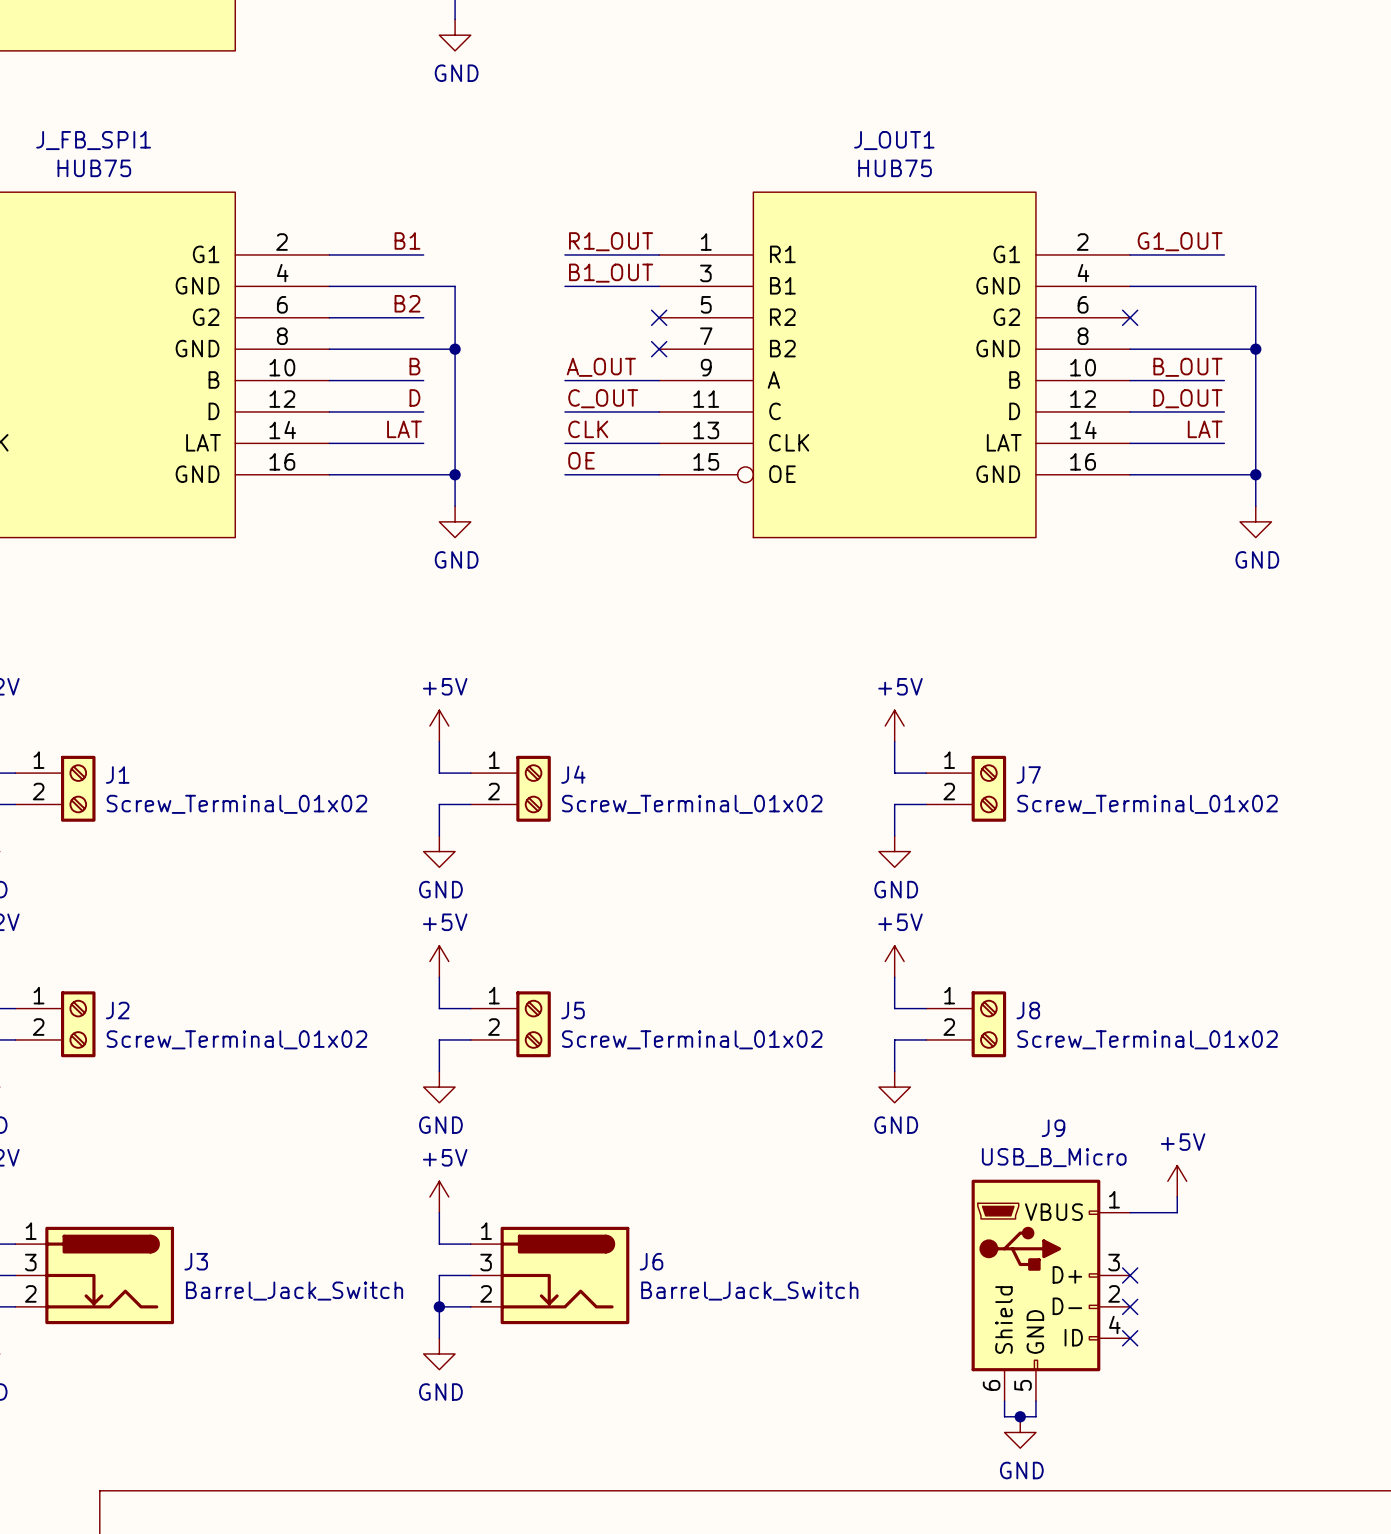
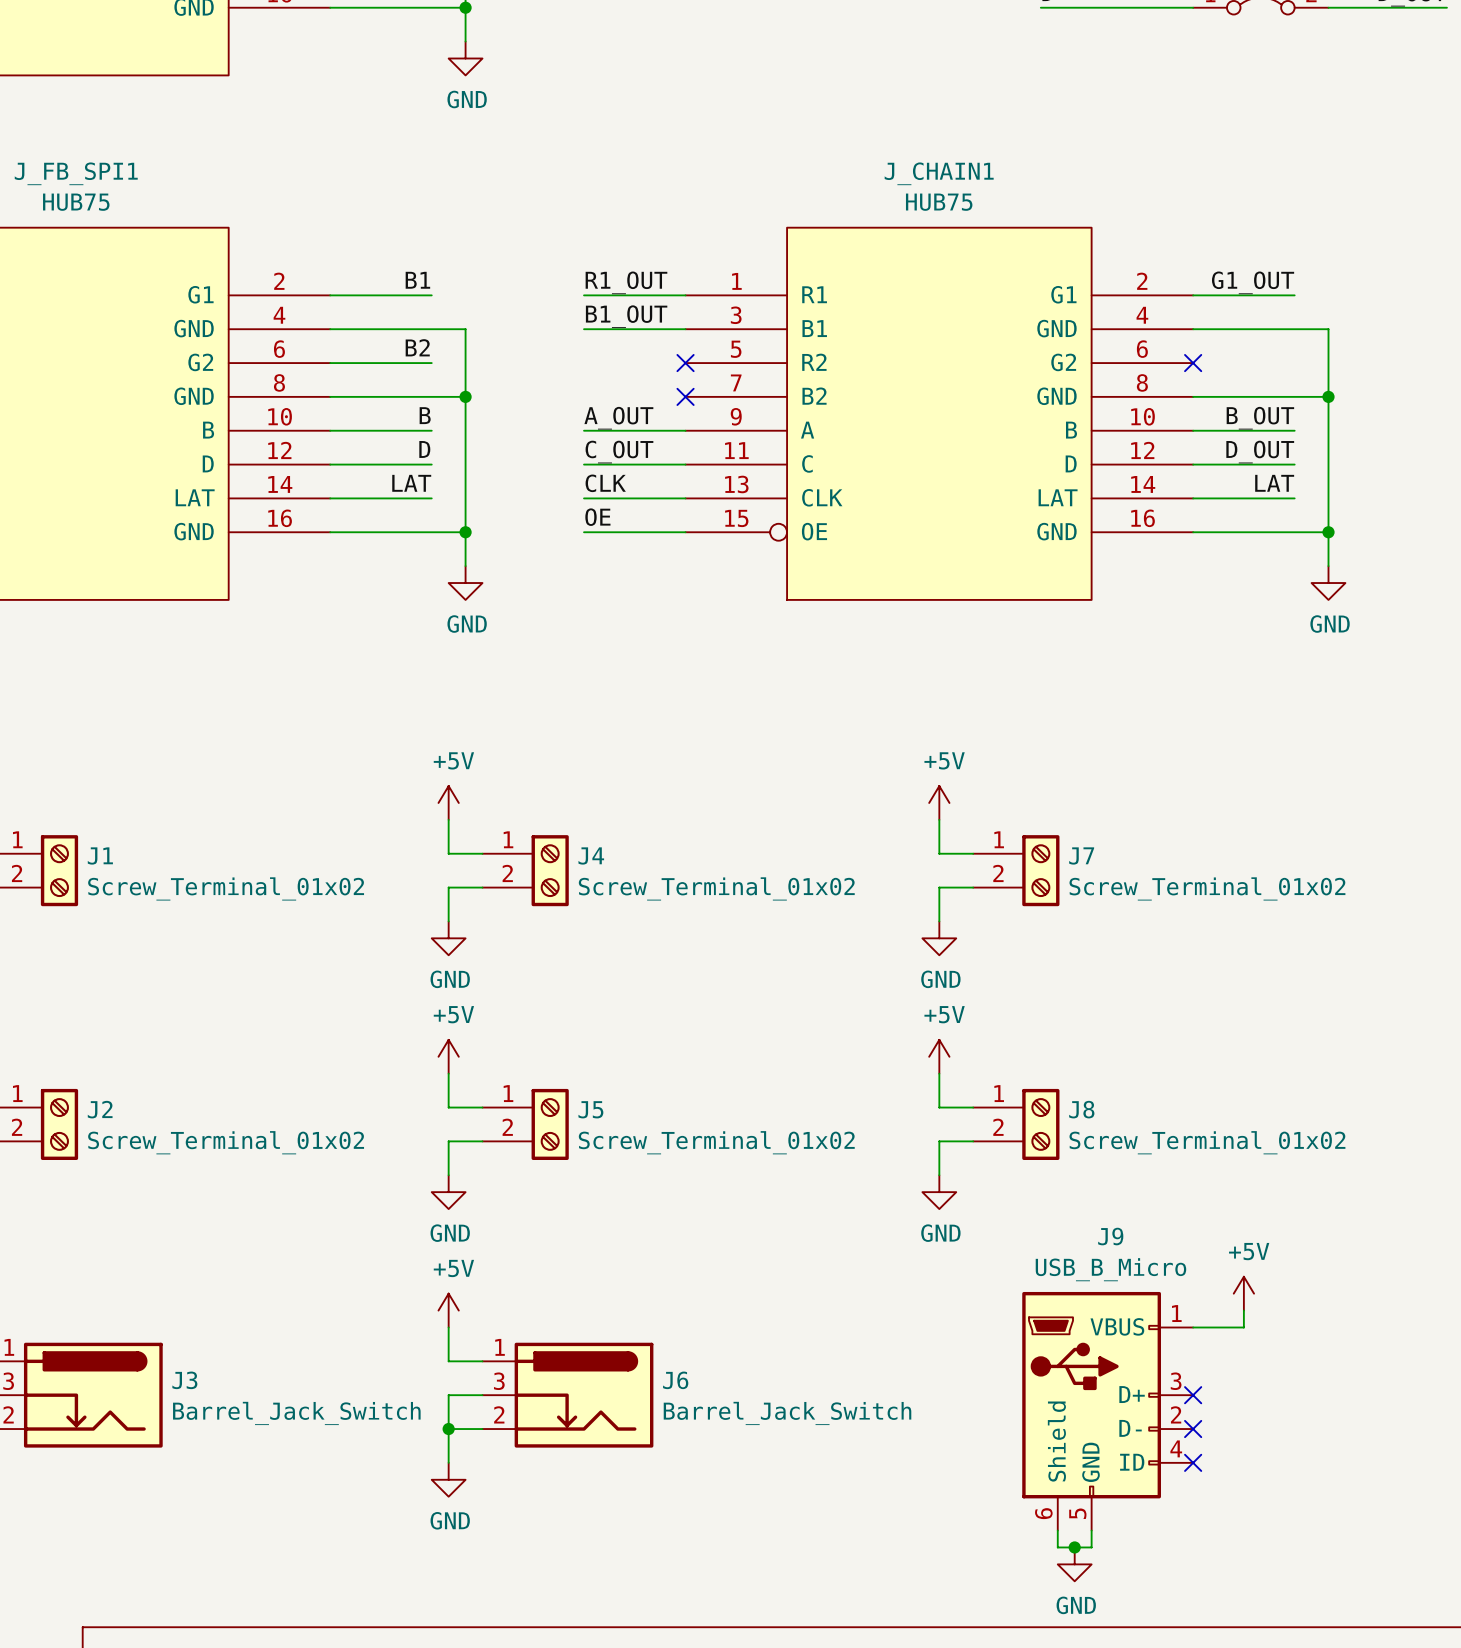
J_OUT1 name: J_OUT1 (894, 140) -> J_CHAIN1 (939, 173)

